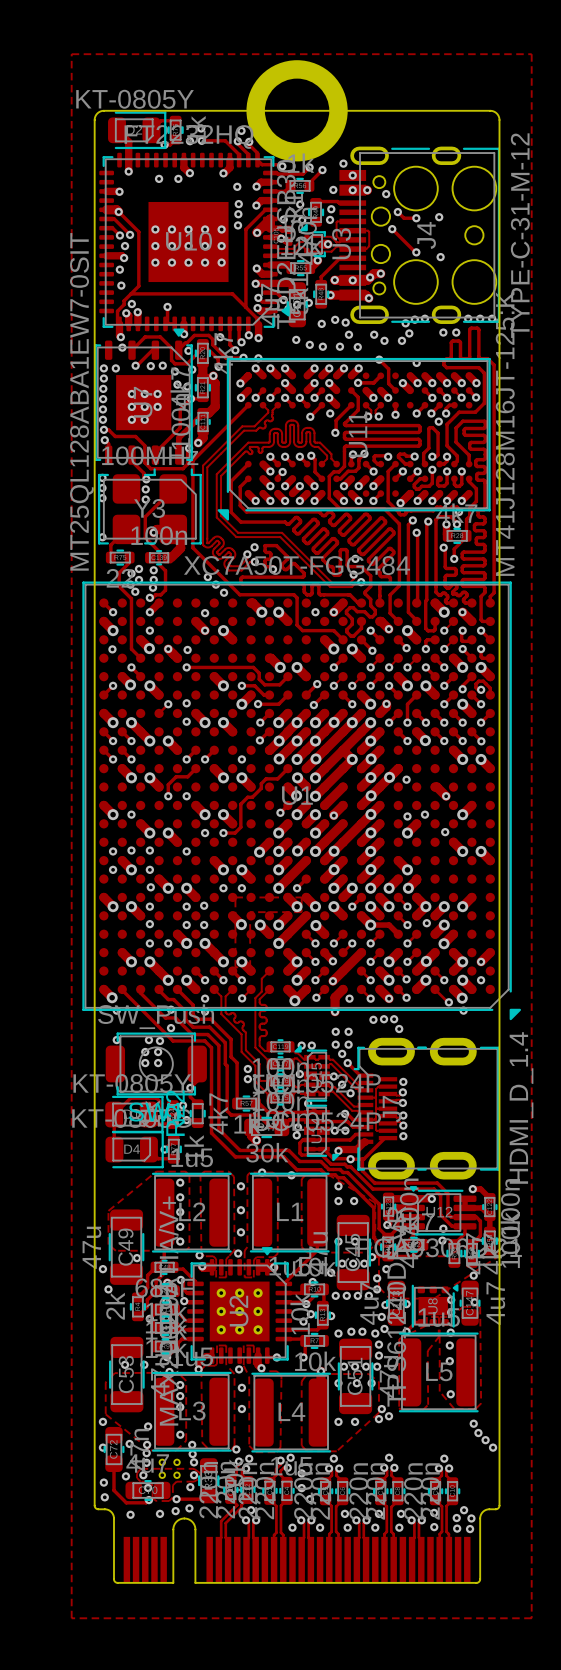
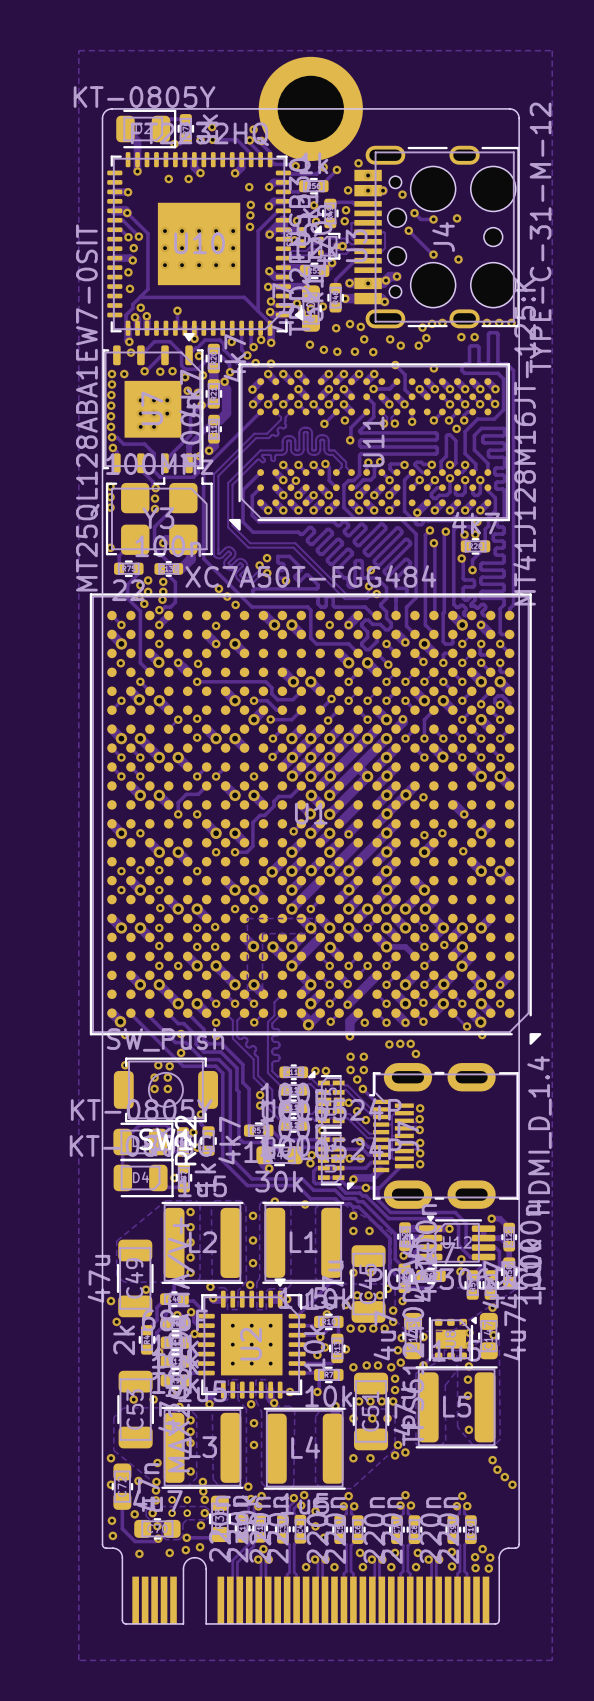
via: (299, 1074) -> none

